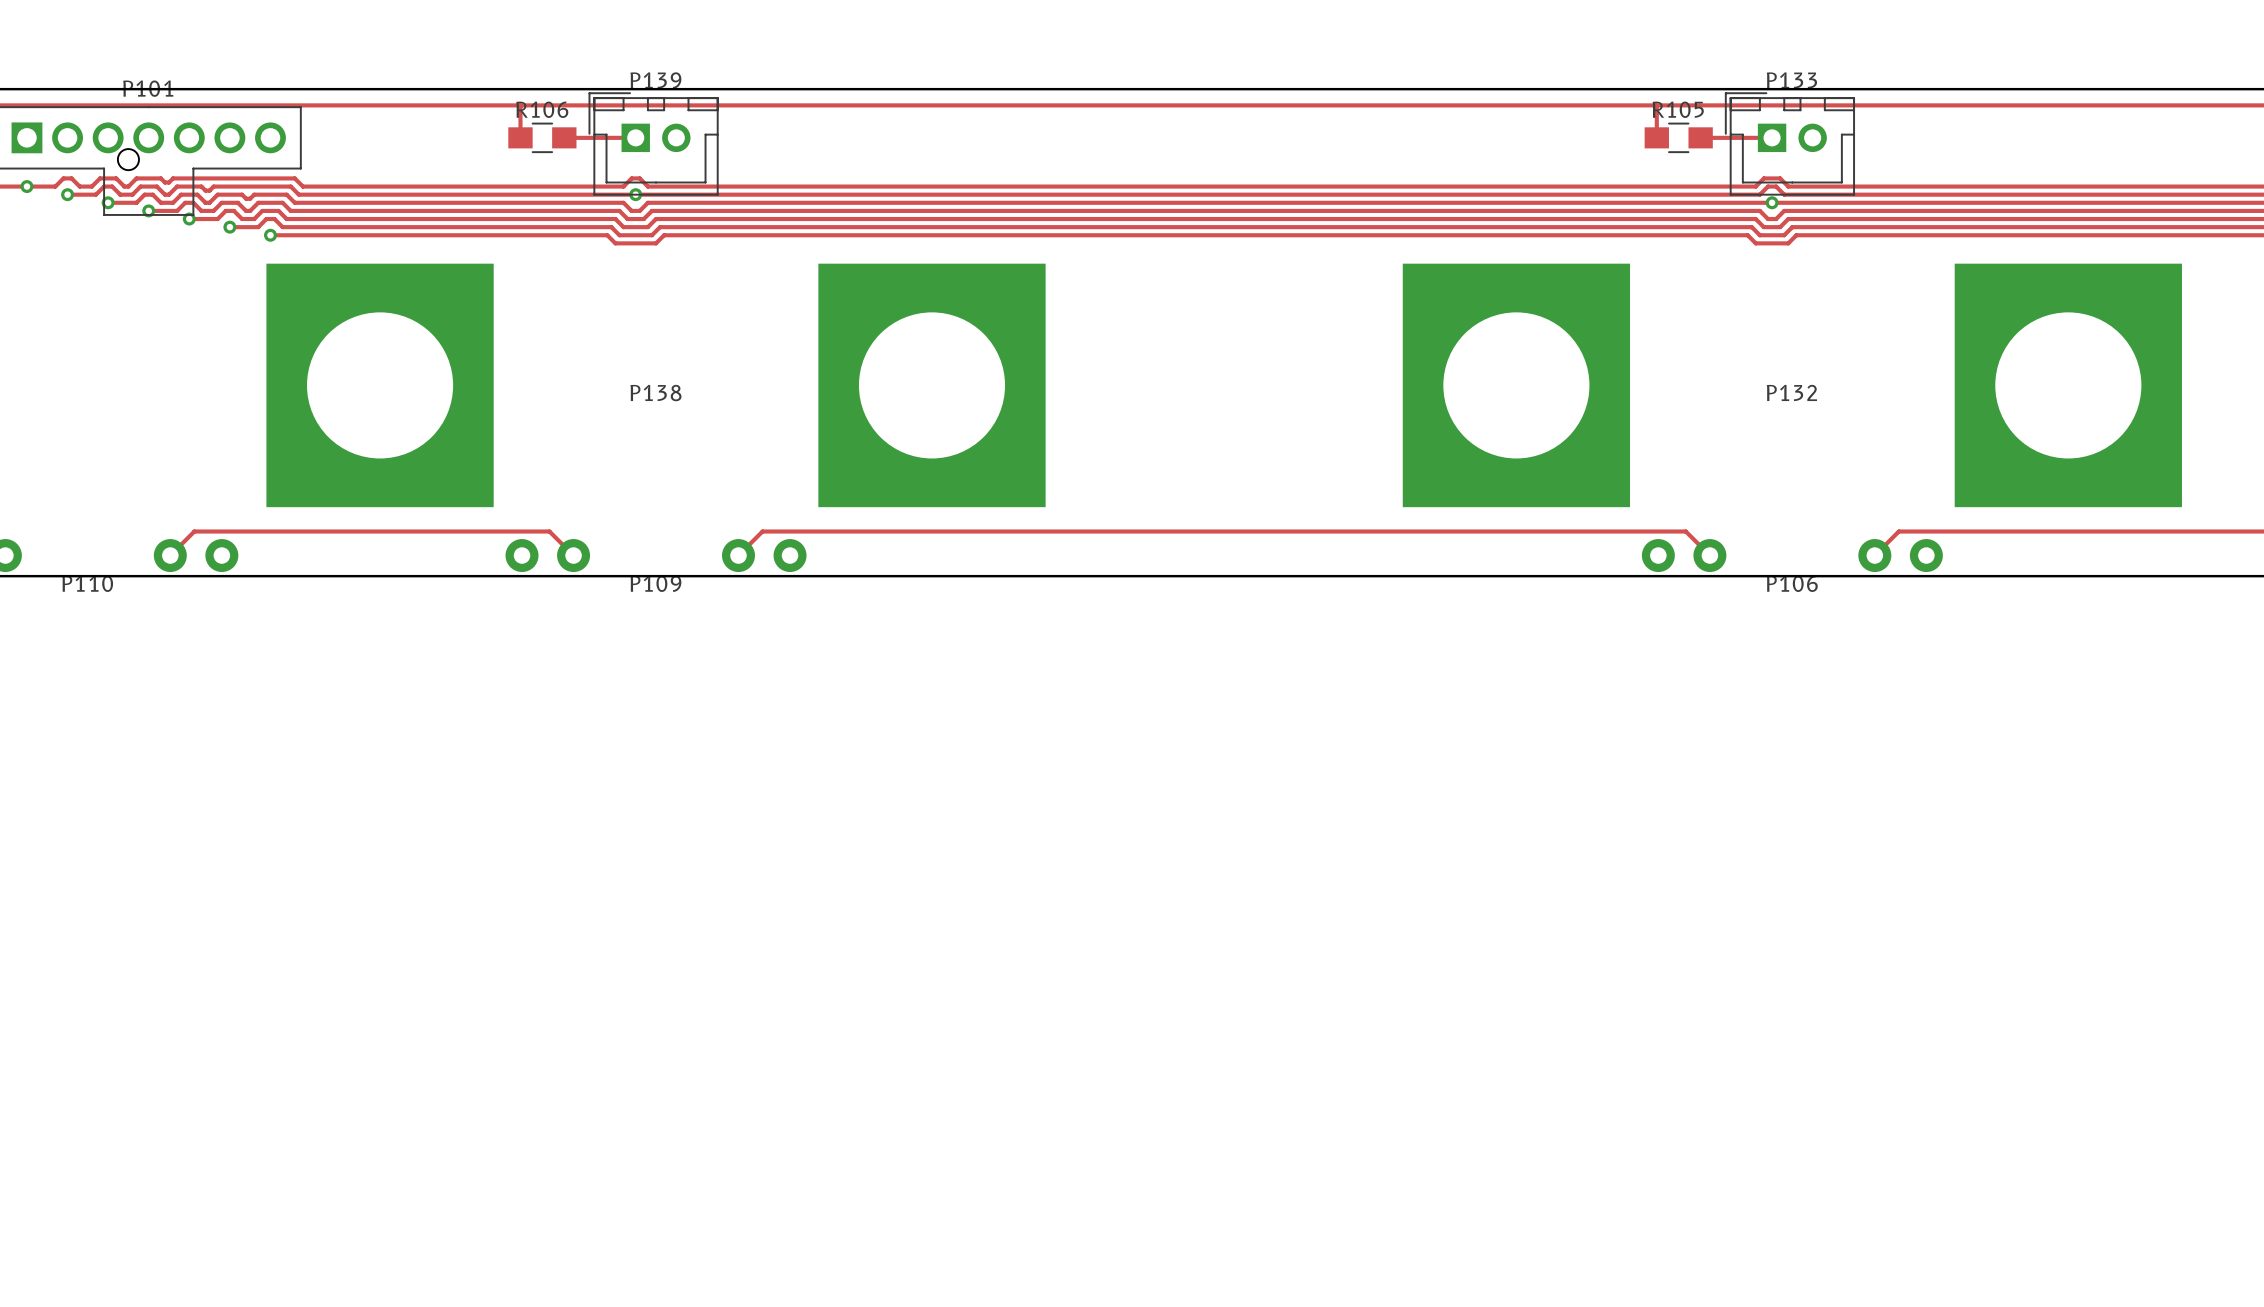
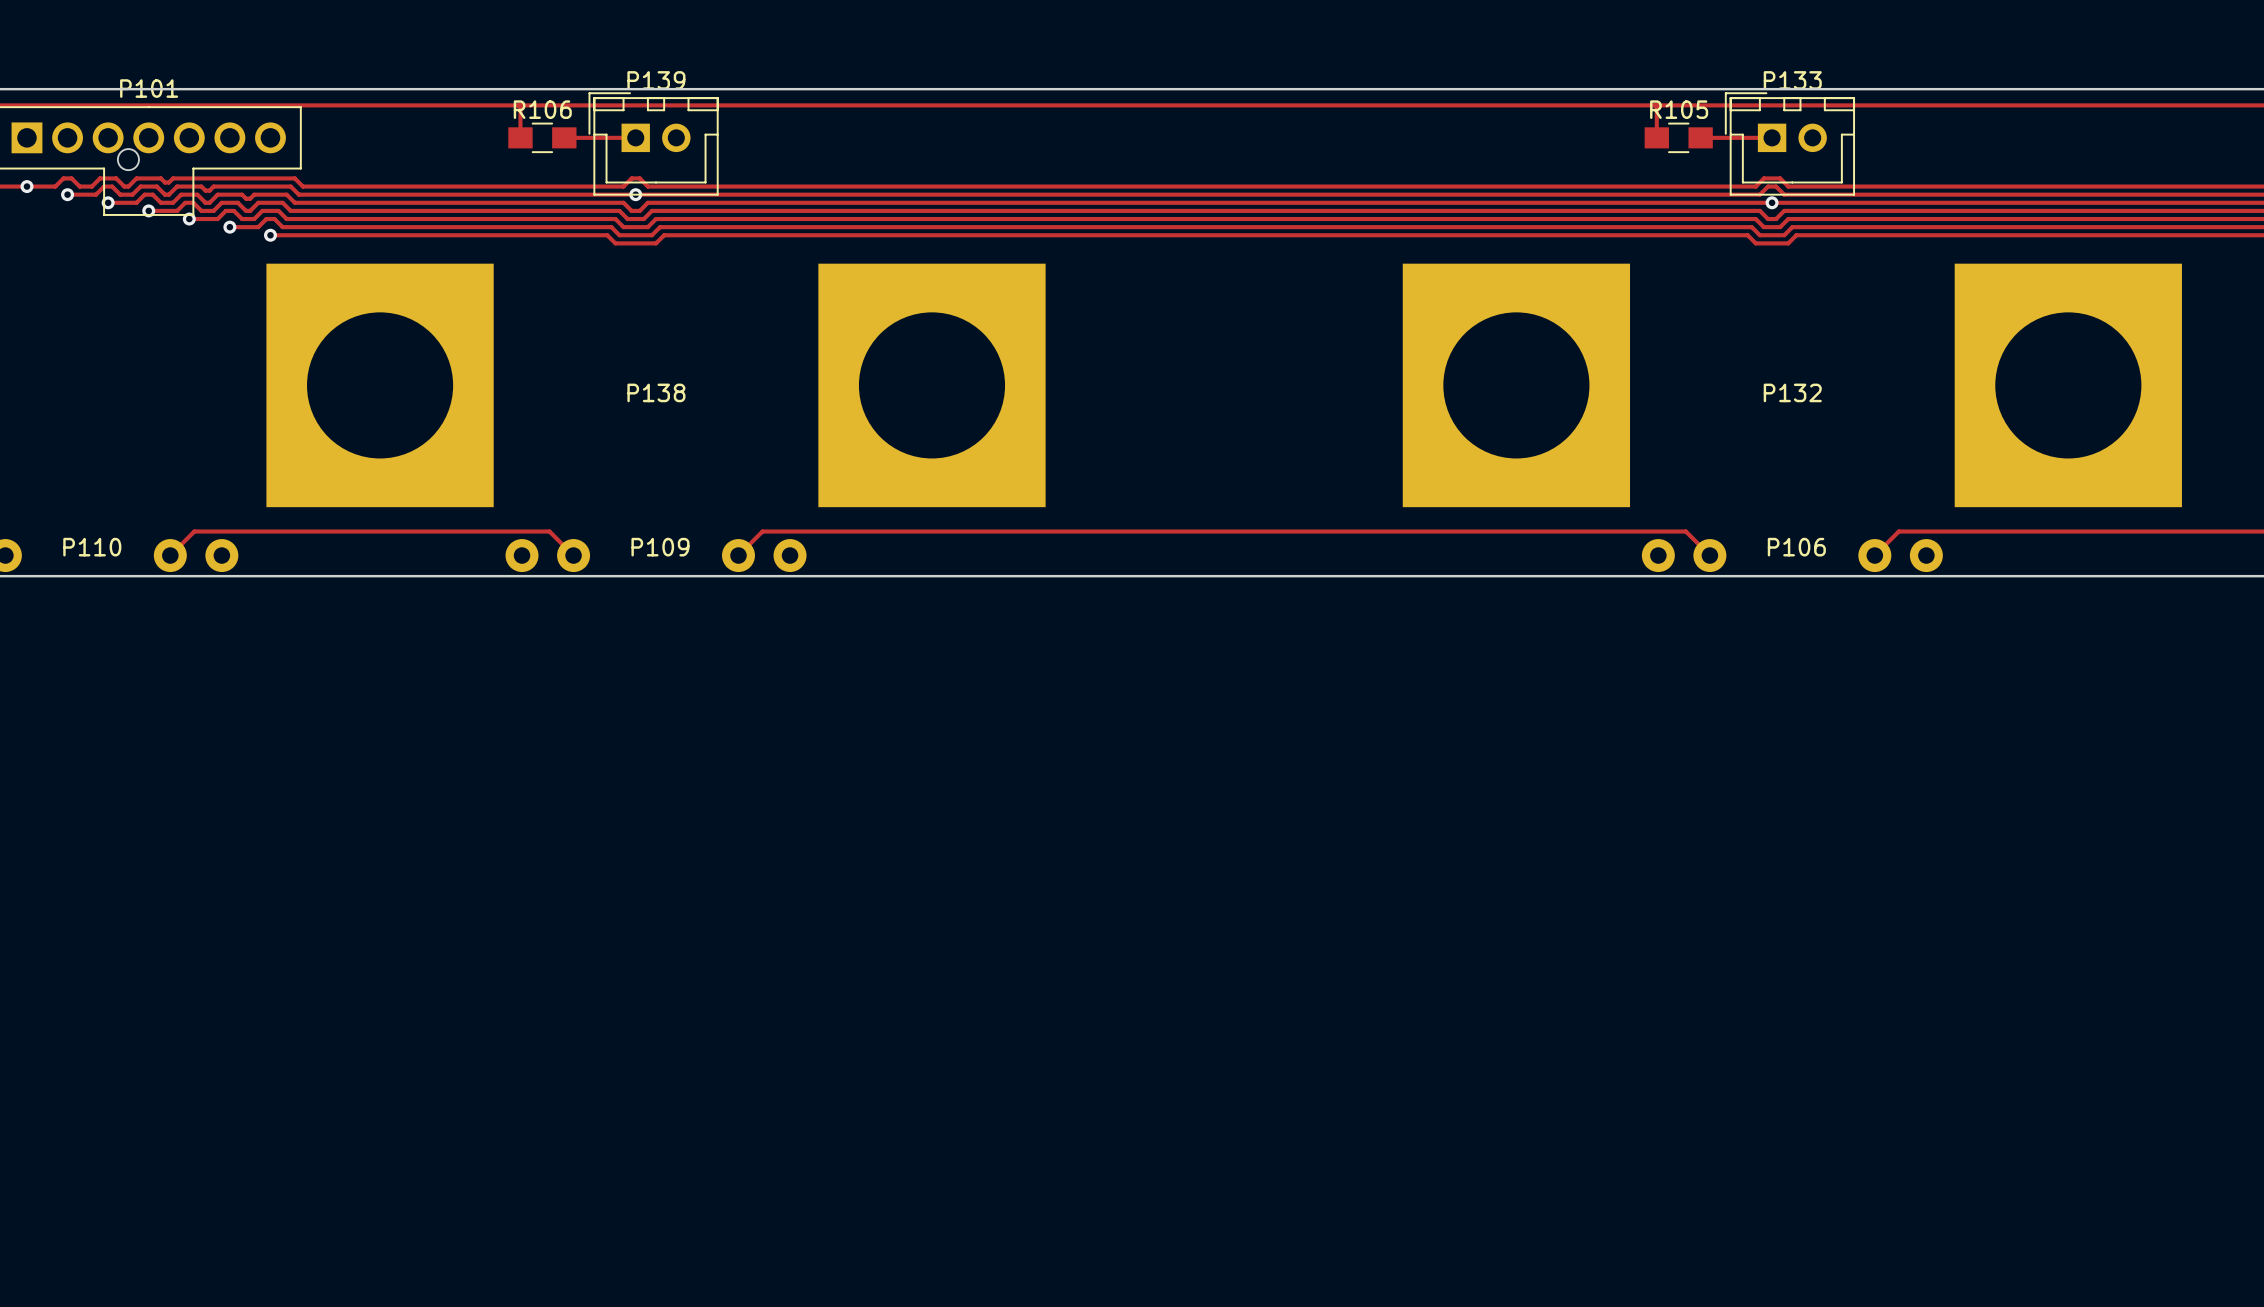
P110 name position: P110 (87, 583) -> P110 (92, 547)
P109 name position: P109 (655, 583) -> P109 (660, 547)
P106 name position: P106 (1792, 583) -> P106 (1796, 547)

